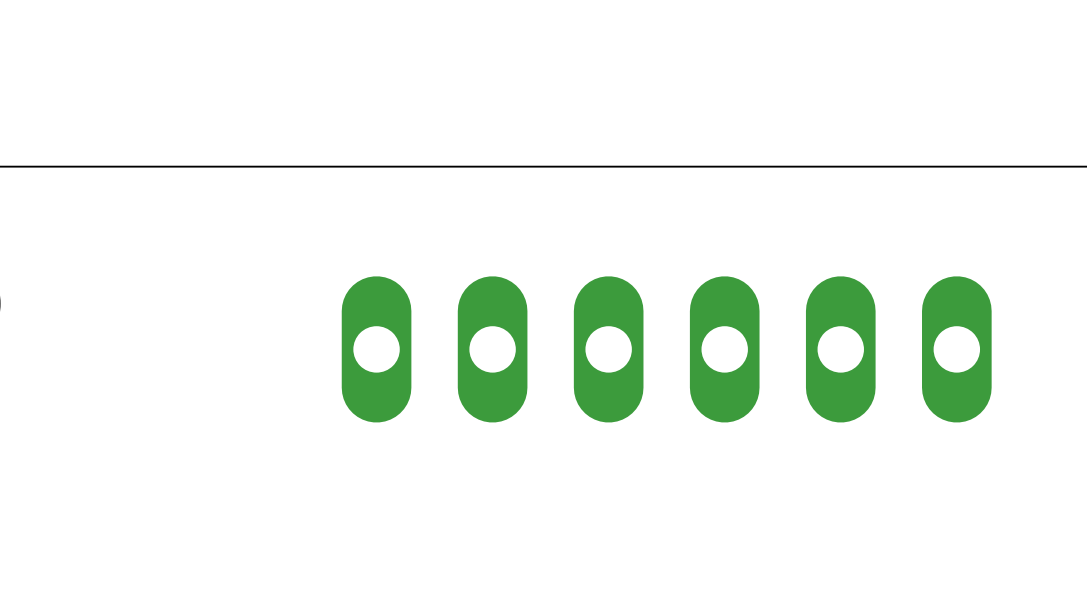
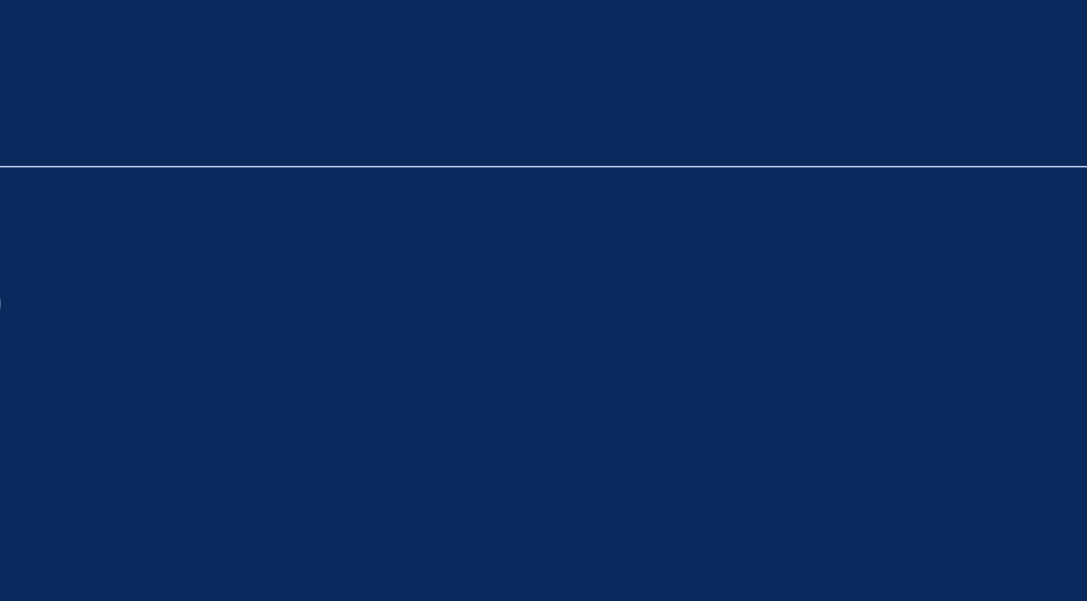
part: (666, 349) -> none

